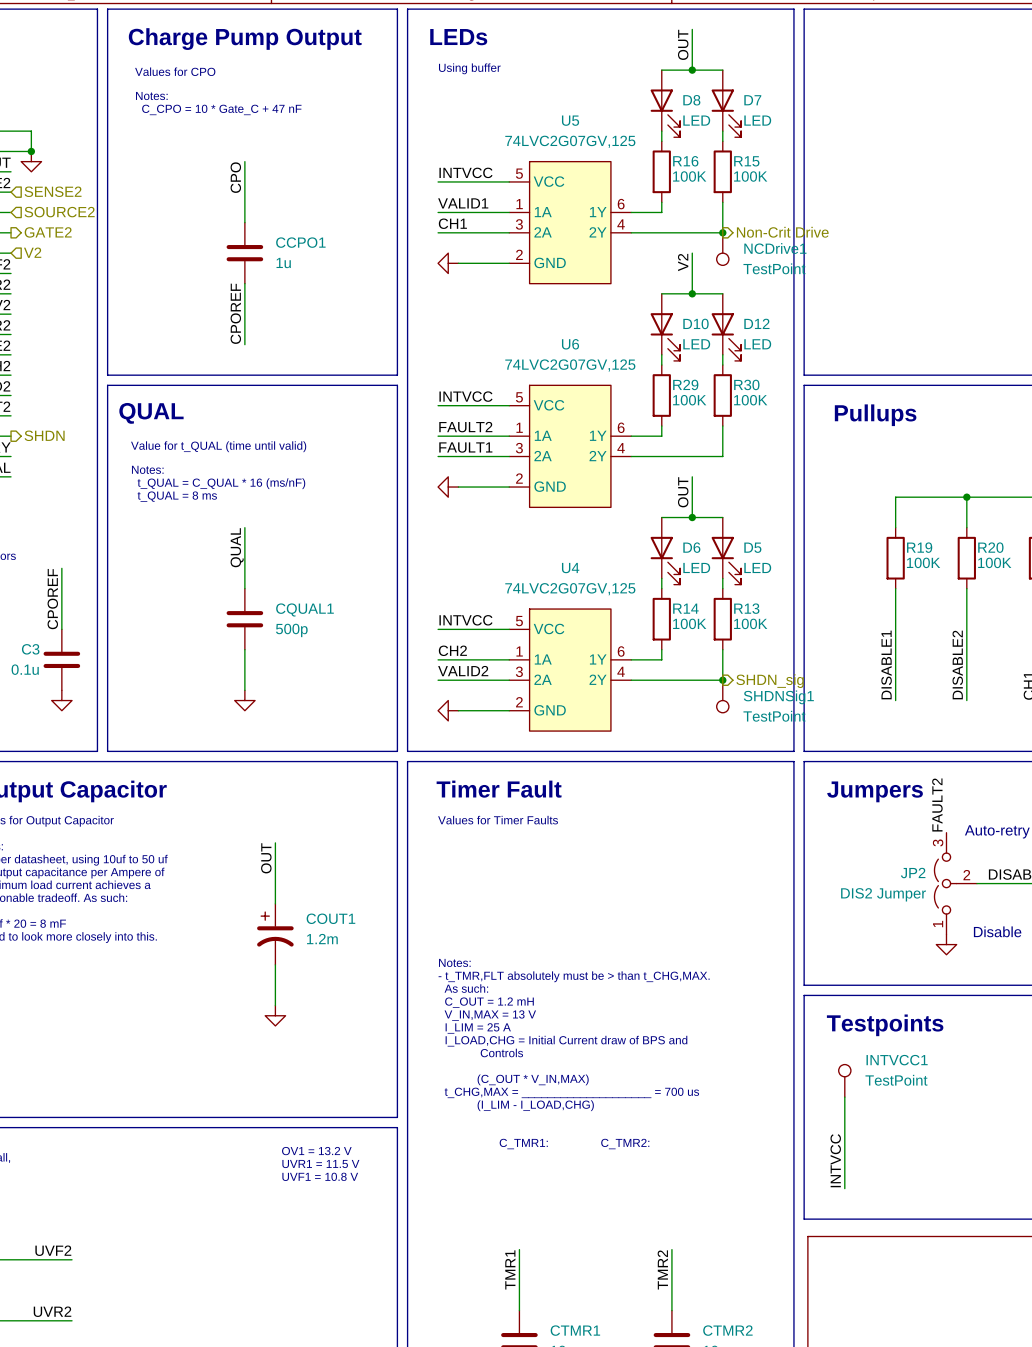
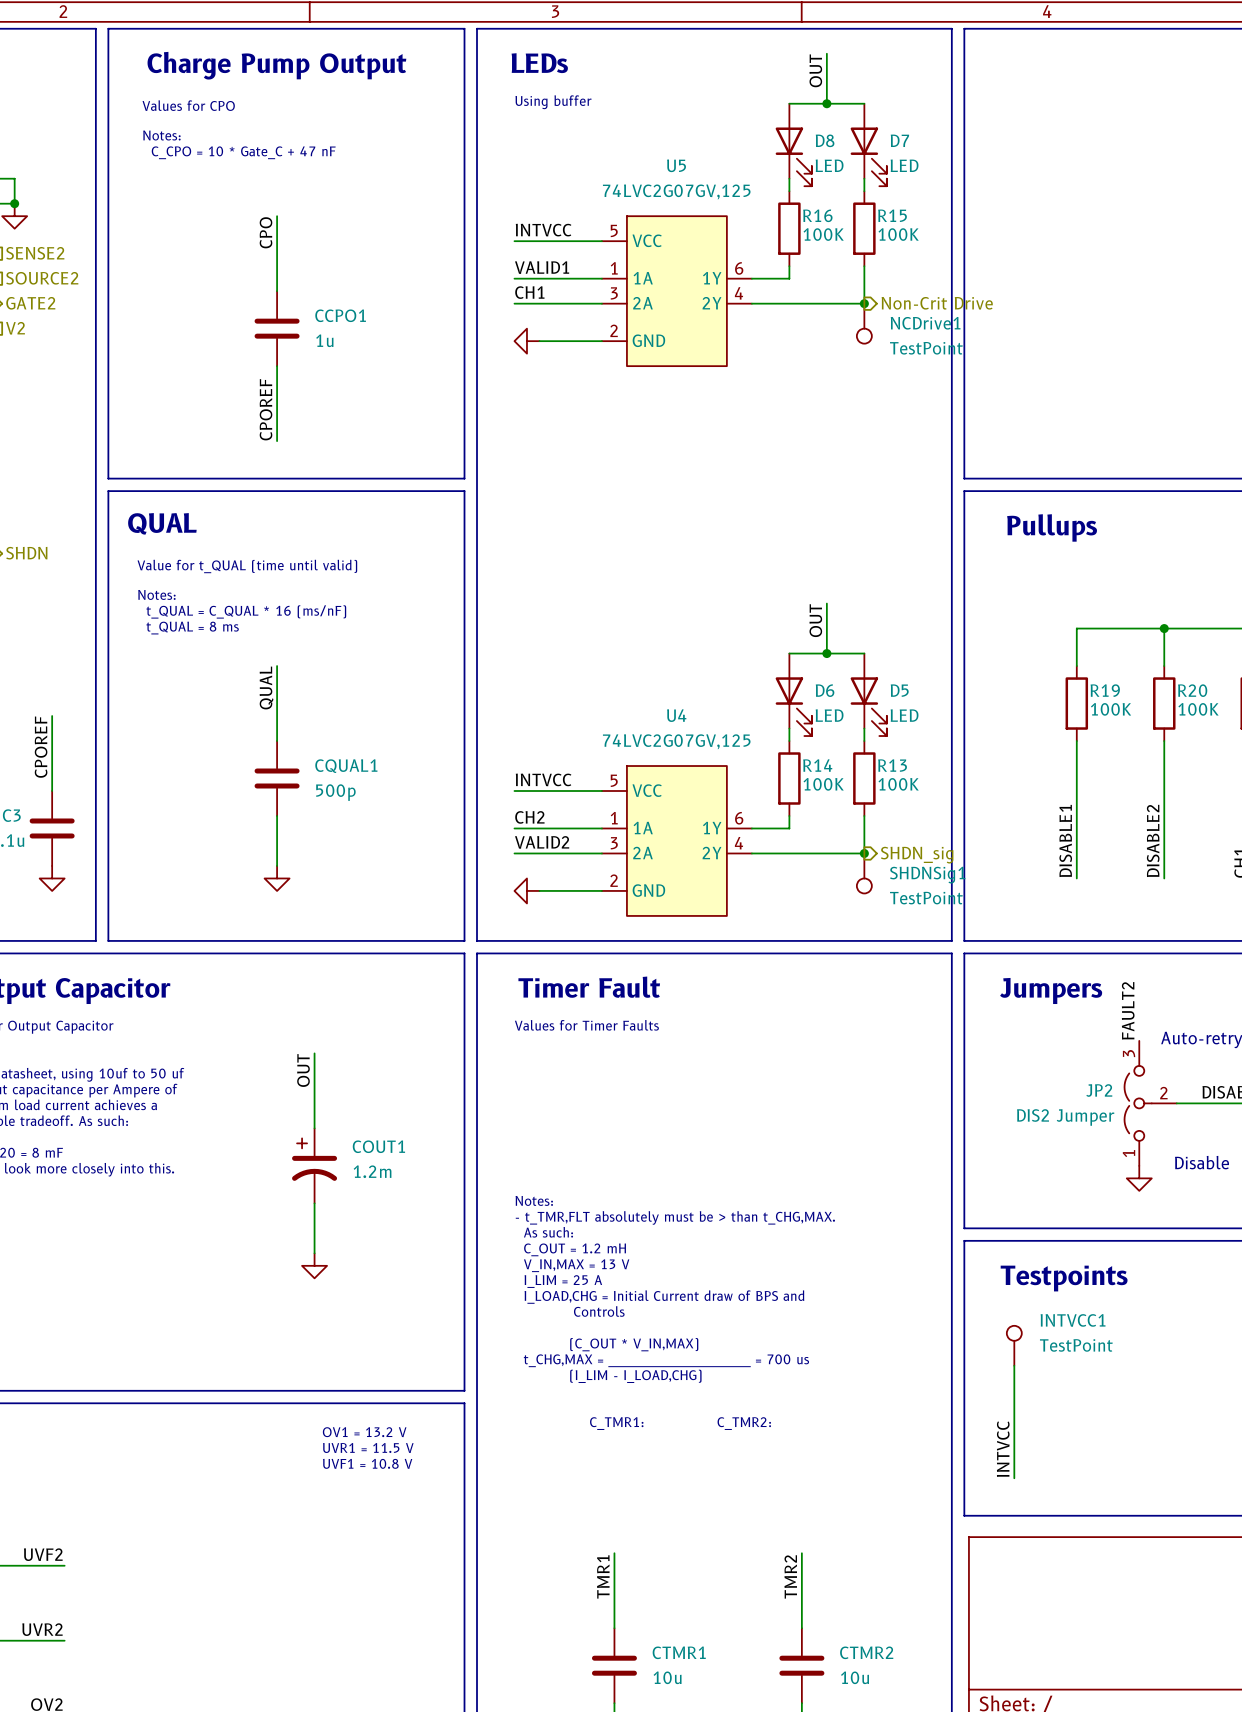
wire: (692, 253) (692, 293) -> none
label: V2 (683, 262) -> none
wire: (661, 293) (722, 293) -> none
junction: (692, 293) -> none
D10: LED (665, 327) -> none
D12: LED (726, 327) -> none
wire: (661, 354) (661, 365) -> none
wire: (722, 354) (722, 365) -> none
R29: 100K (661, 395) -> none
R30: 100K (722, 395) -> none
label: INTVCC (465, 396) -> none
wire: (438, 405) (509, 405) -> none
wire: (661, 426) (661, 436) (631, 436) -> none
wire: (722, 426) (722, 456) (631, 456) -> none
label: FAULT2 (465, 427) -> none
wire: (438, 436) (509, 436) -> none
U6: 74LVC2G07GV,125 (570, 446) -> none
label: FAULT1 (465, 447) -> none
wire: (438, 456) (509, 456) -> none
power symbol: (448, 487) -> none
wire: (458, 487) (509, 487) -> none

